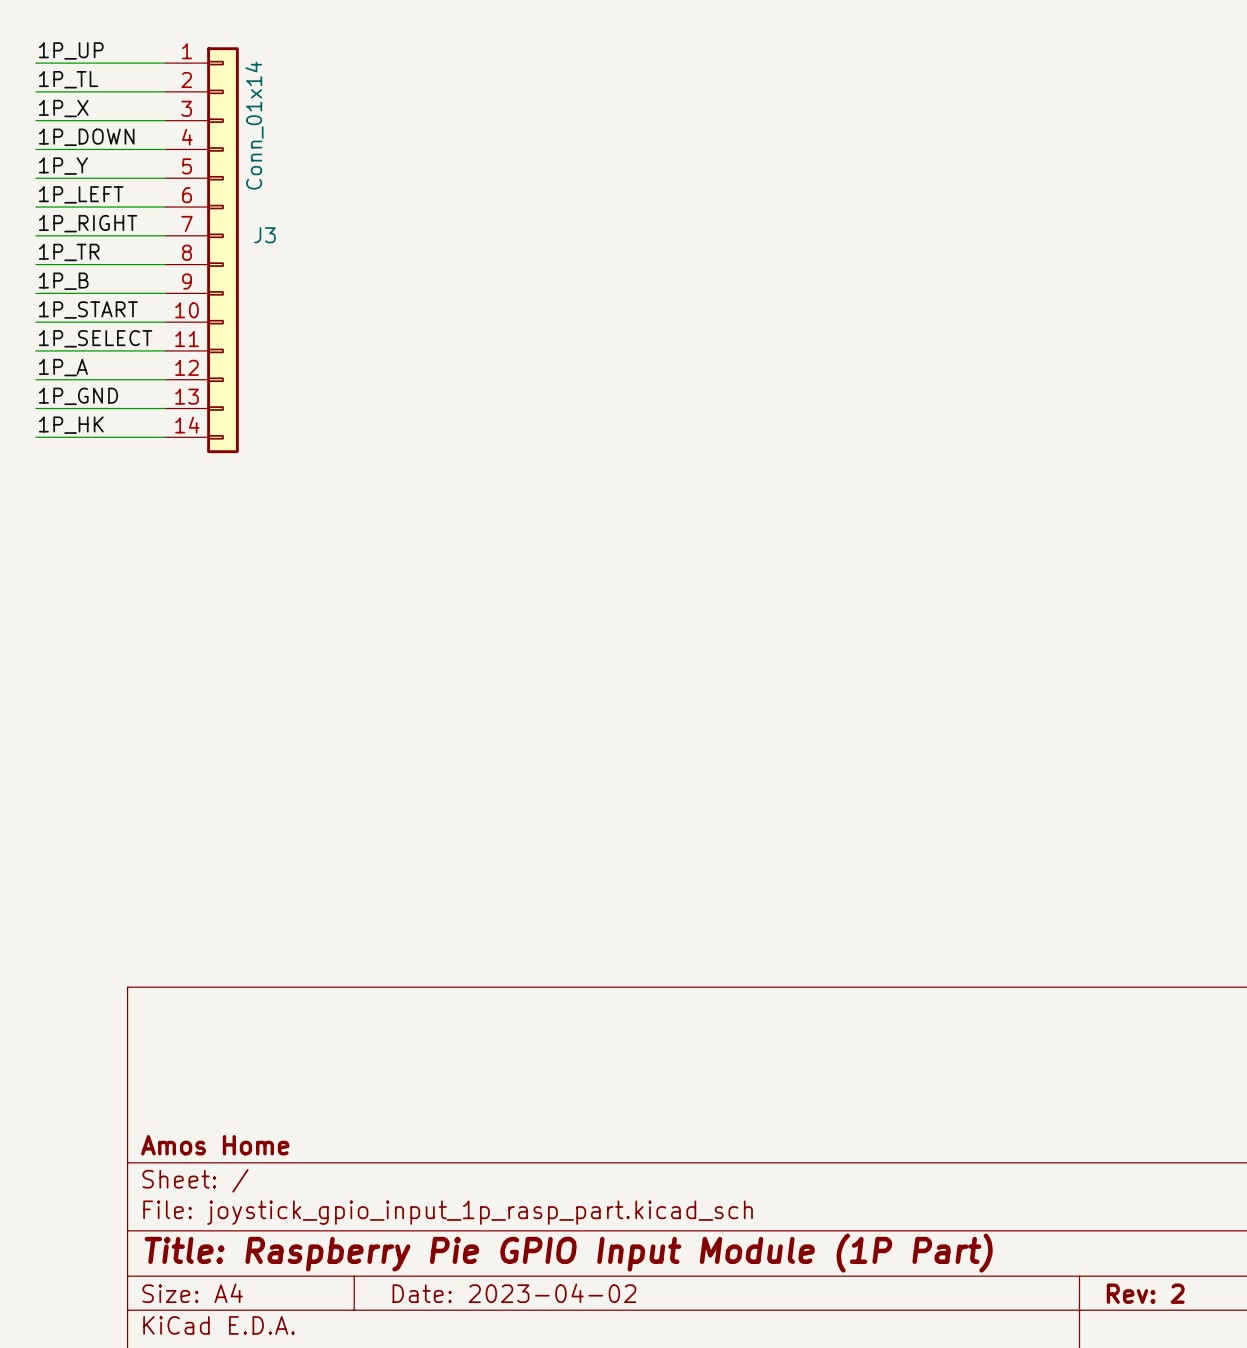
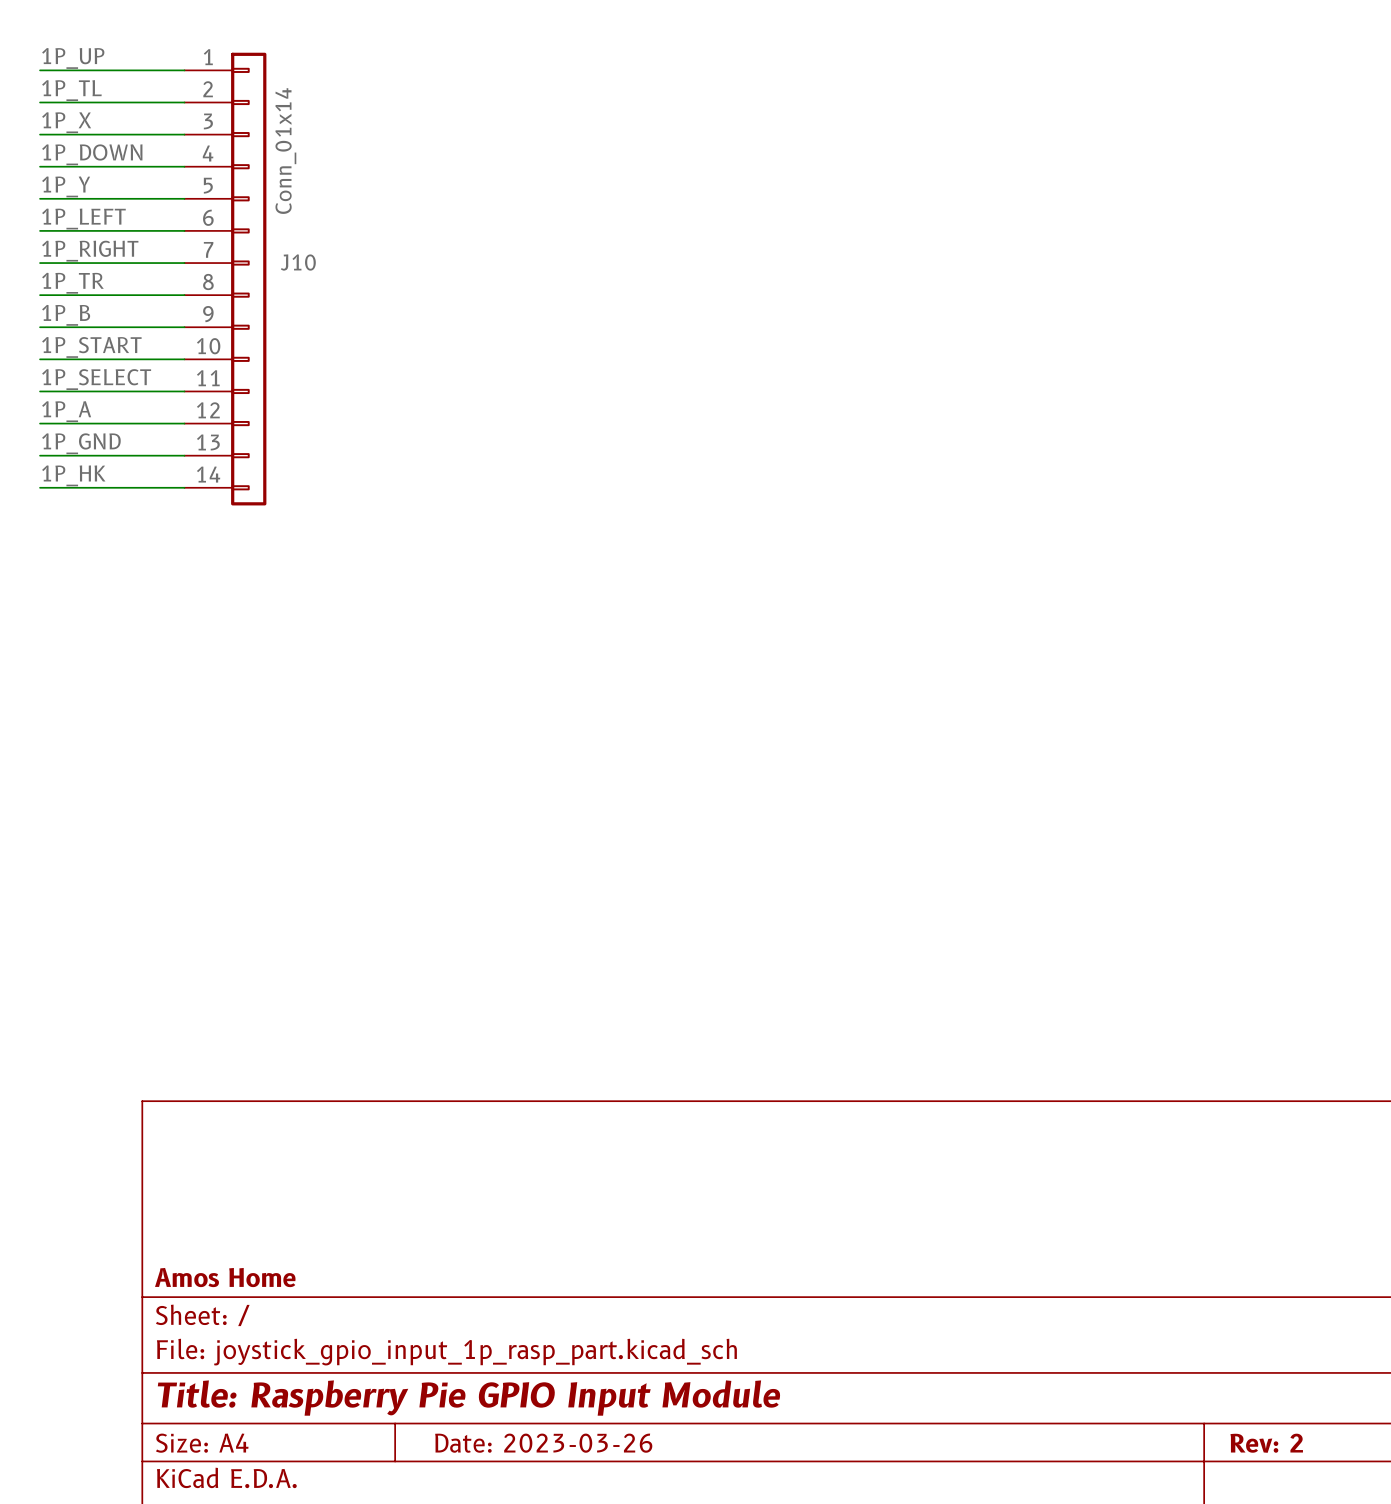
J3 name: J3 (264, 235) -> J10 (298, 262)
title block: Title: Raspberry Pie GPIO Input Module (1P Part) (568, 1253) -> Title: Raspberry Pie GPIO Input Module (469, 1398)
title block: Date: 2023-04-02 (514, 1293) -> Date: 2023-03-26 (543, 1443)

